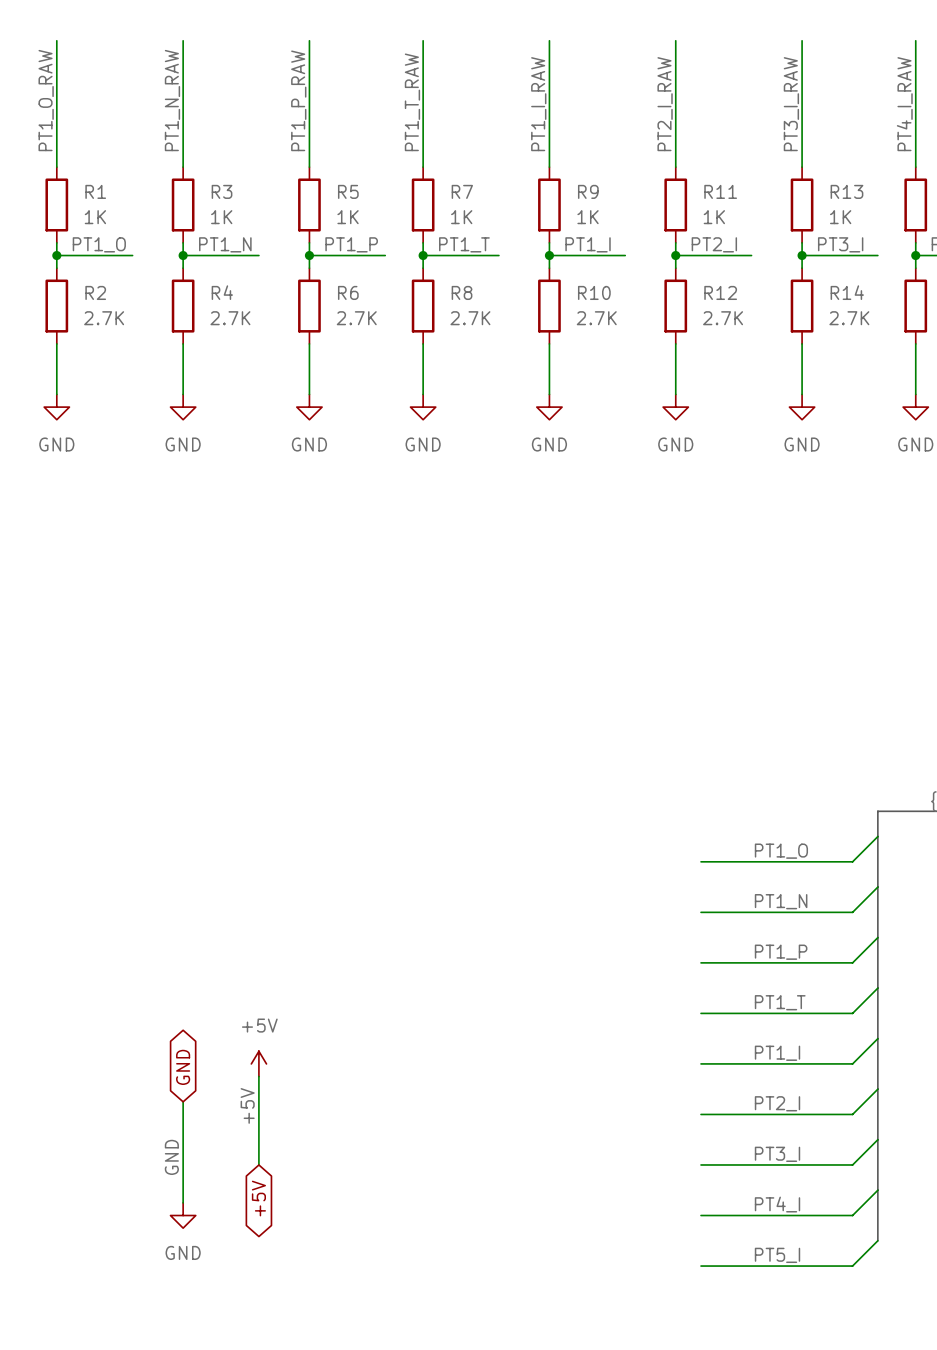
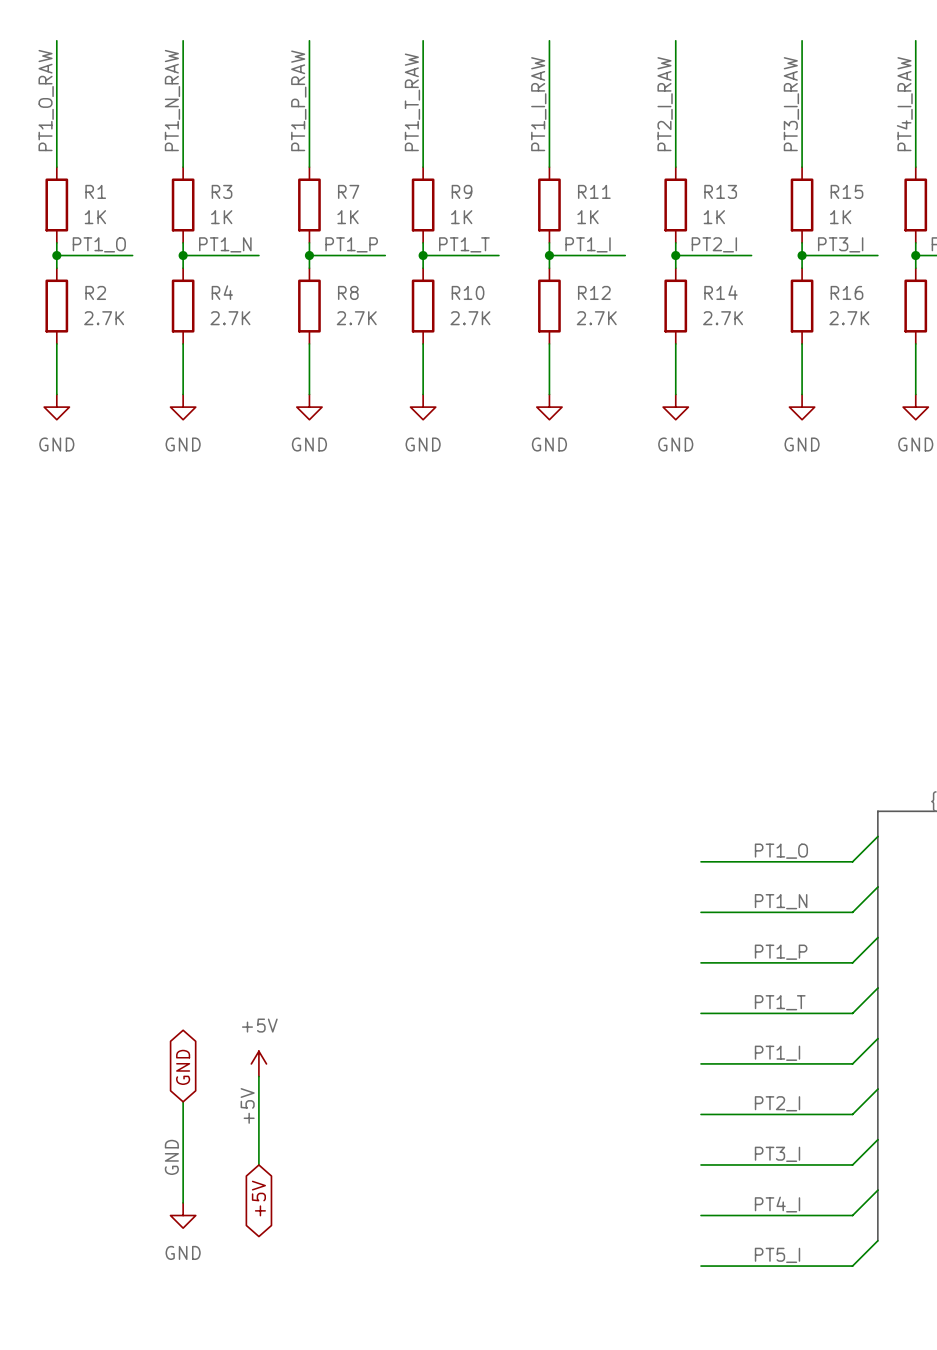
R5 name: R5 (348, 191) -> R7 (348, 191)
R7 name: R7 (462, 191) -> R9 (462, 191)
R9 name: R9 (588, 191) -> R11 (594, 191)
R11 name: R11 (720, 191) -> R13 (720, 191)
R13 name: R13 (846, 191) -> R15 (846, 191)
R6 name: R6 (348, 292) -> R8 (348, 292)
R8 name: R8 (462, 292) -> R10 (468, 292)
R10 name: R10 (594, 292) -> R12 (594, 292)
R12 name: R12 (720, 292) -> R14 (720, 292)
R14 name: R14 (847, 292) -> R16 (846, 292)

